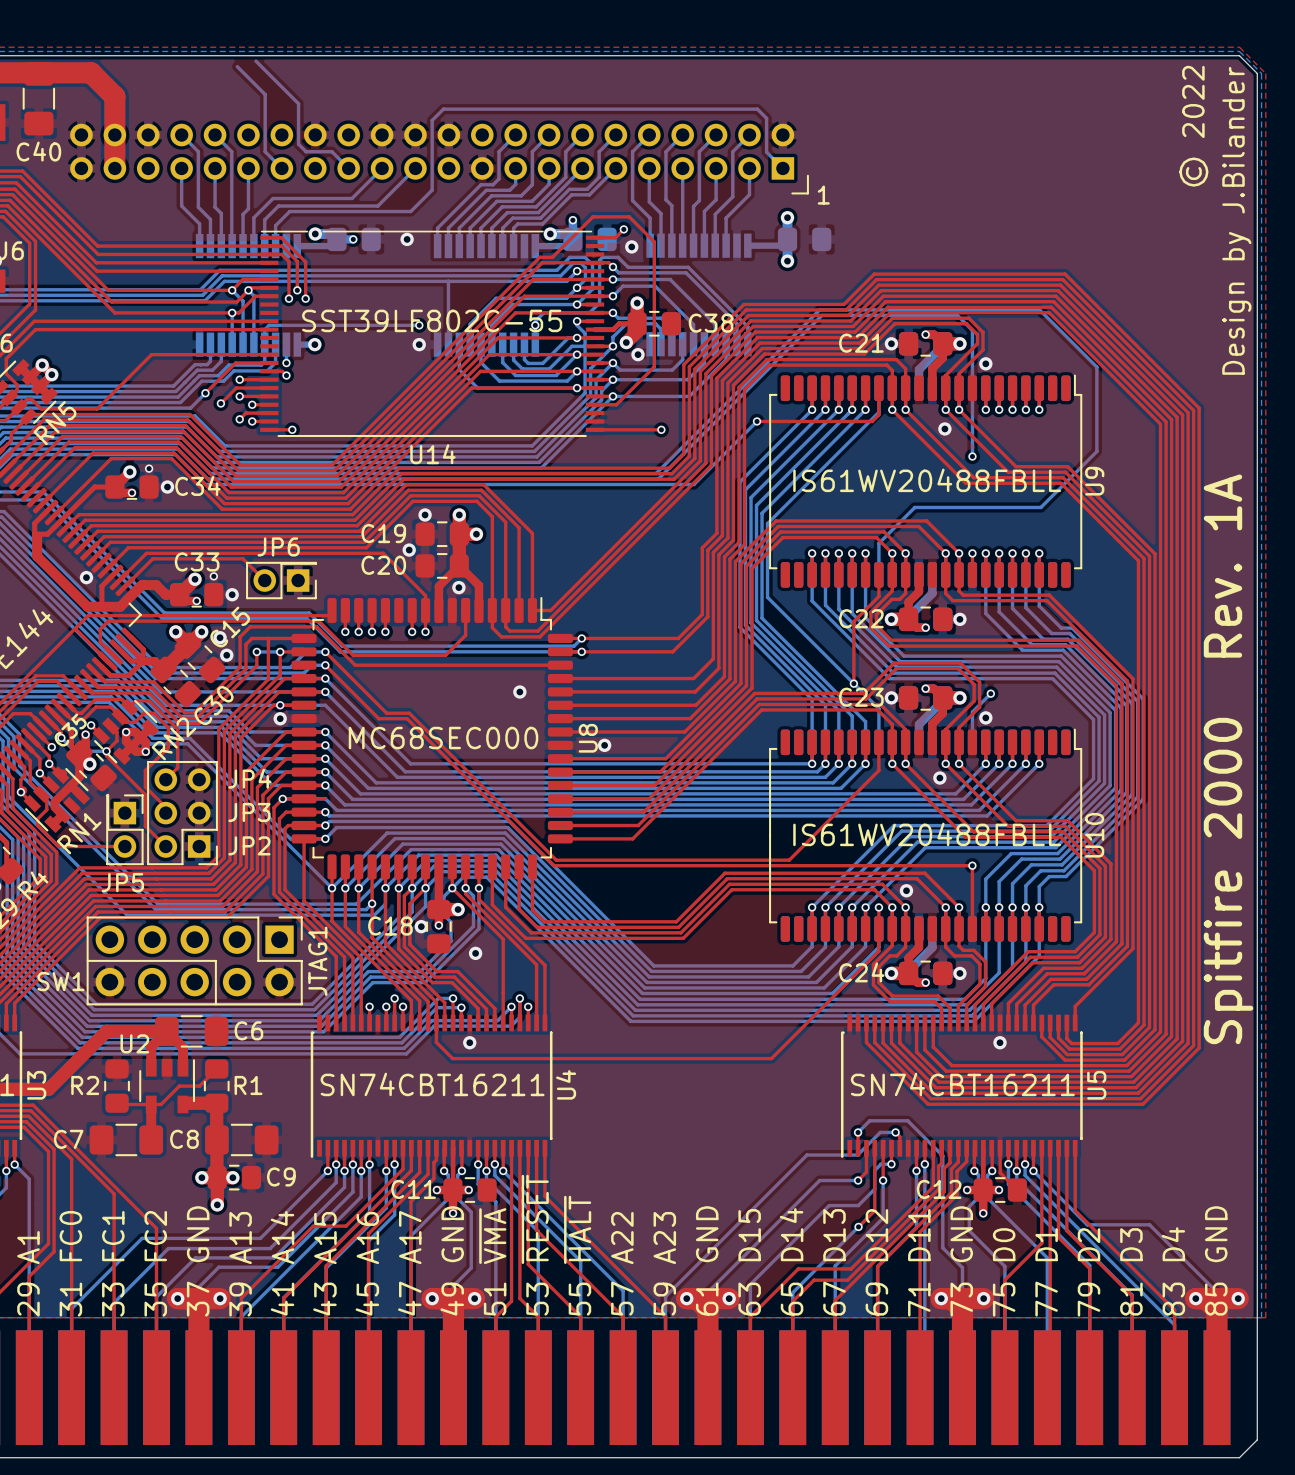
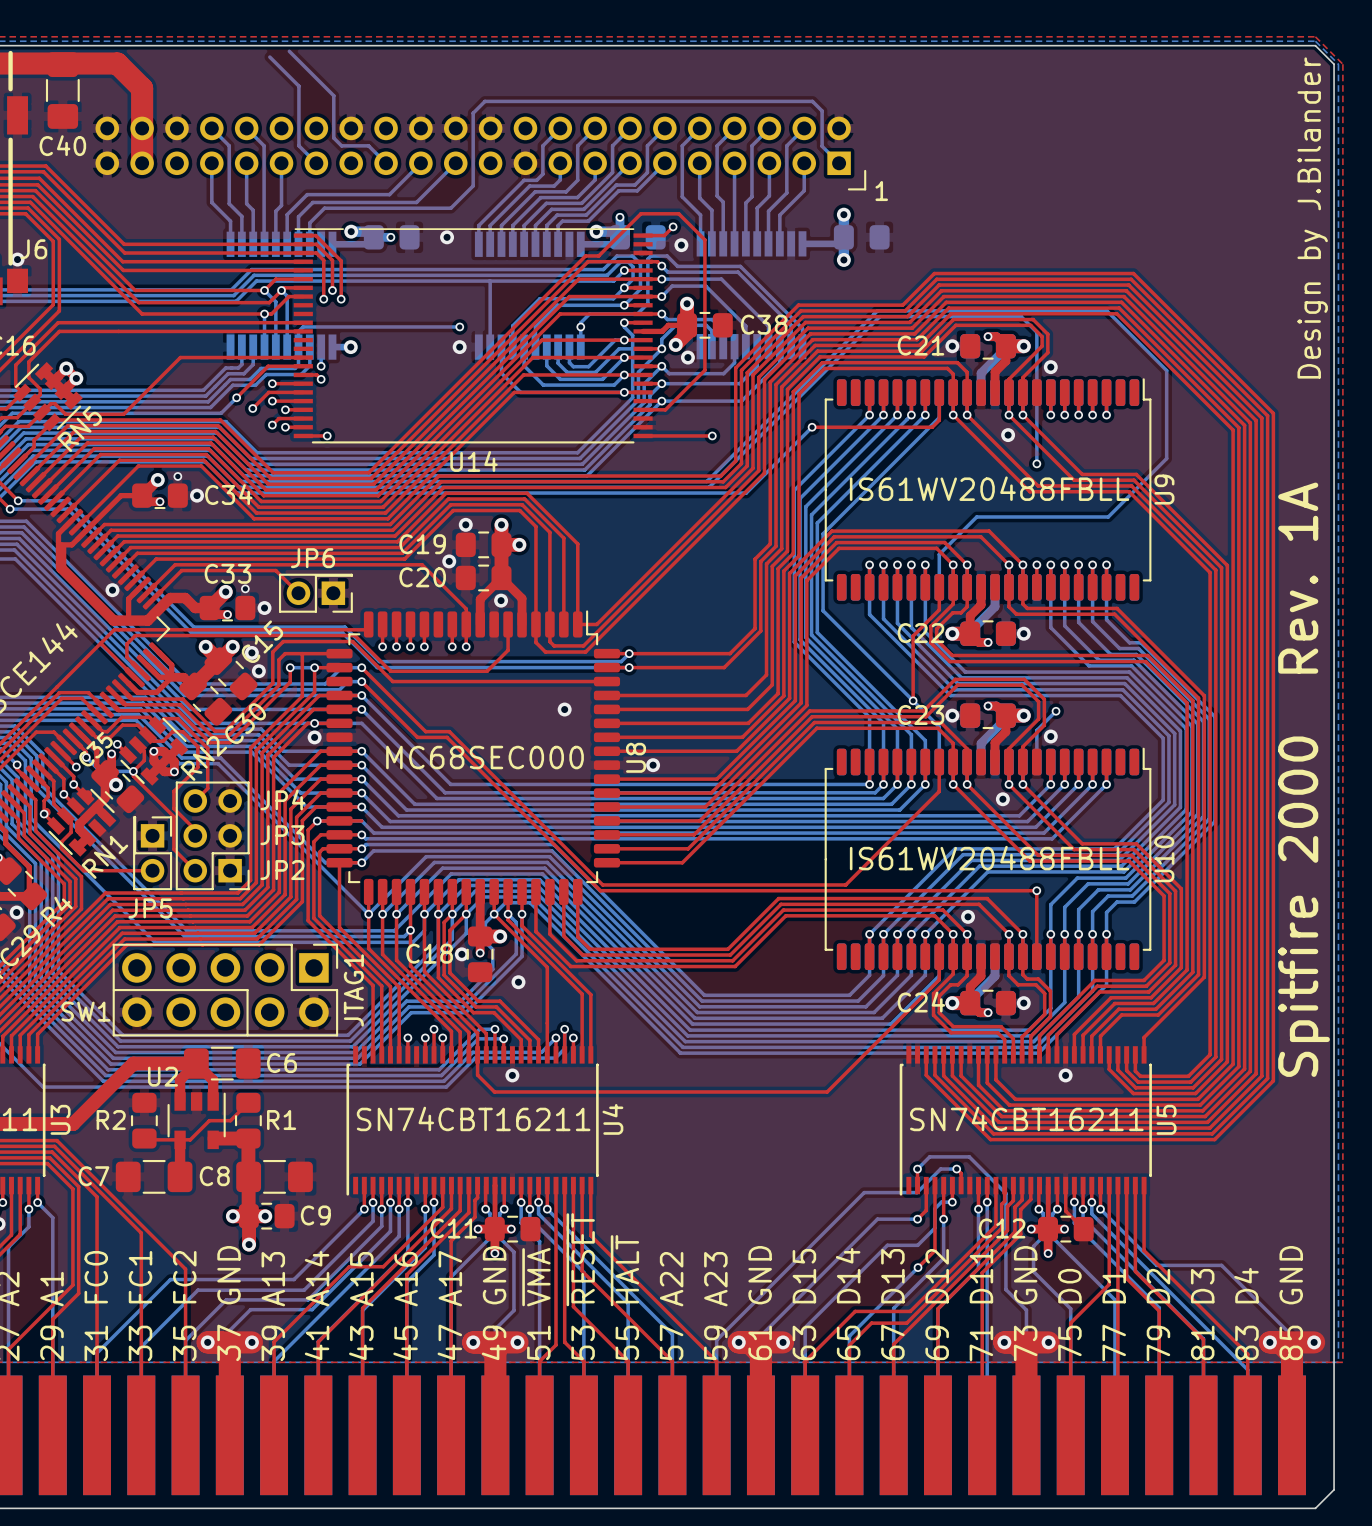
text: © 2022 (1193, 126) -> none
U14 footprint: [260, 230, 605, 437] -> [293, 228, 653, 444]
text: SST39LF802C-55 (432, 320) -> none

